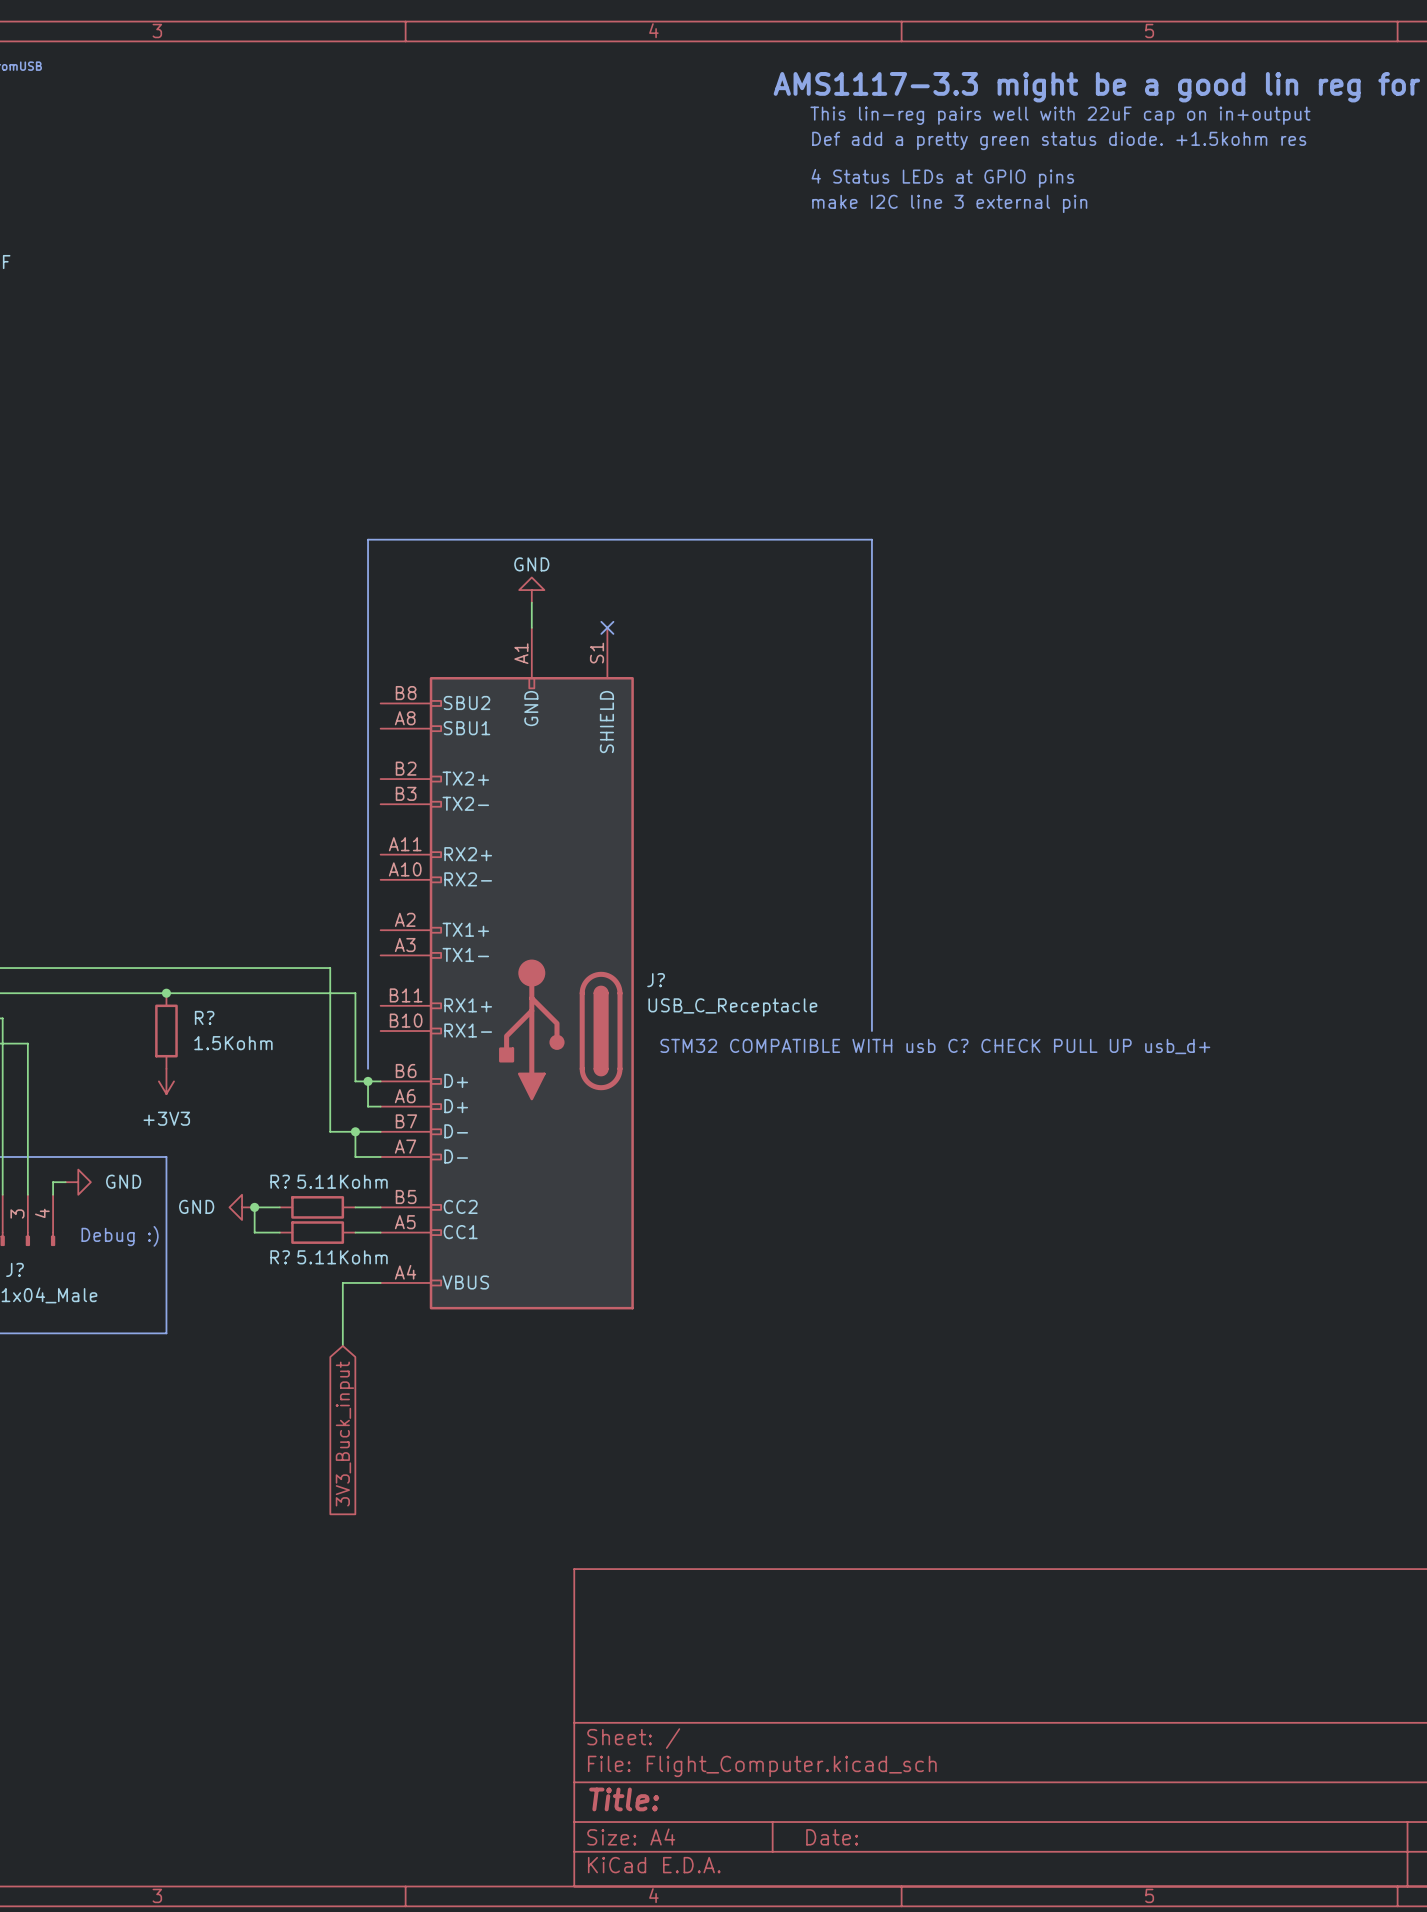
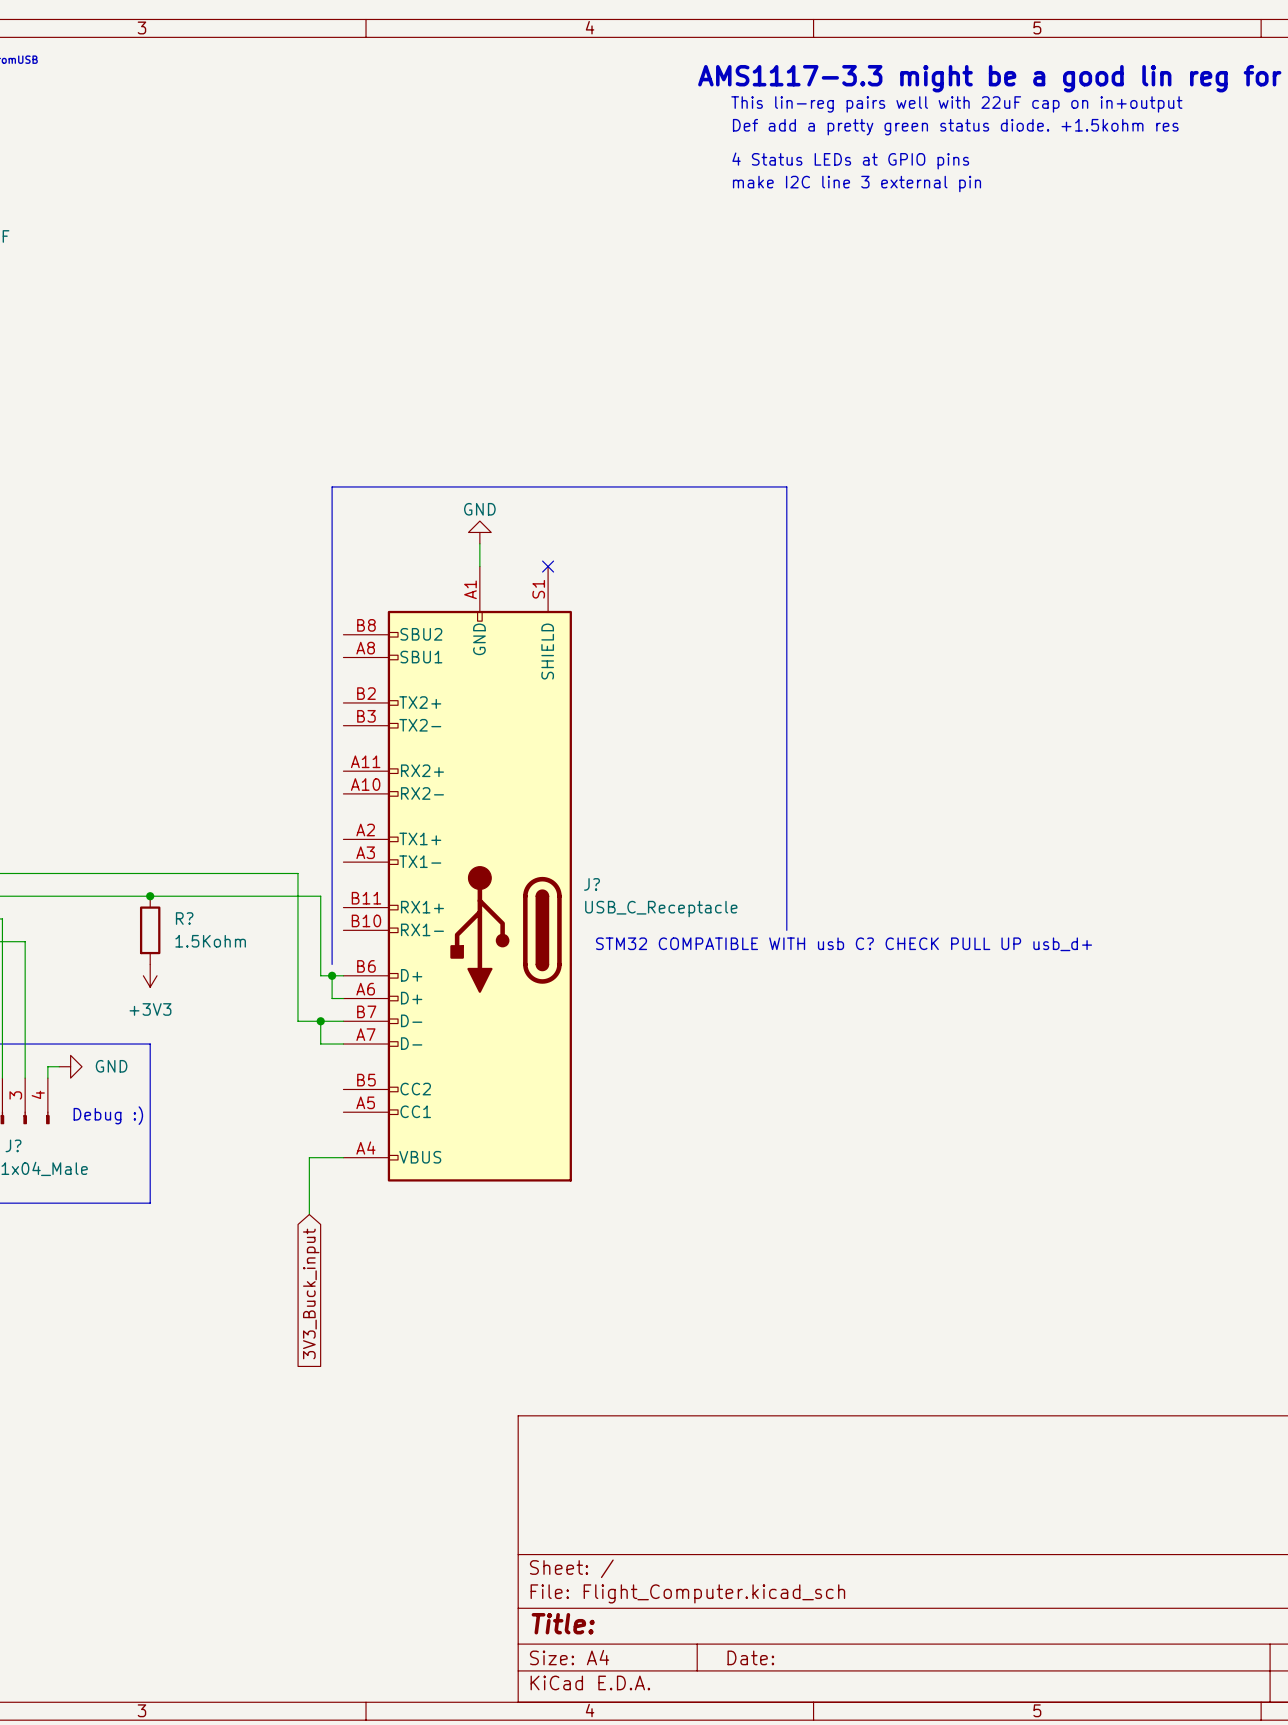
power symbol: GND (242, 1207) -> none
junction: (254, 1207) -> none
wire: (279, 1207) (254, 1207) (254, 1232) (279, 1232) -> none
R?: 5.11Kohm (317, 1207) -> none
wire: (355, 1207) (380, 1207) -> none
R?: 5.11Kohm (317, 1232) -> none
wire: (355, 1232) (380, 1232) -> none

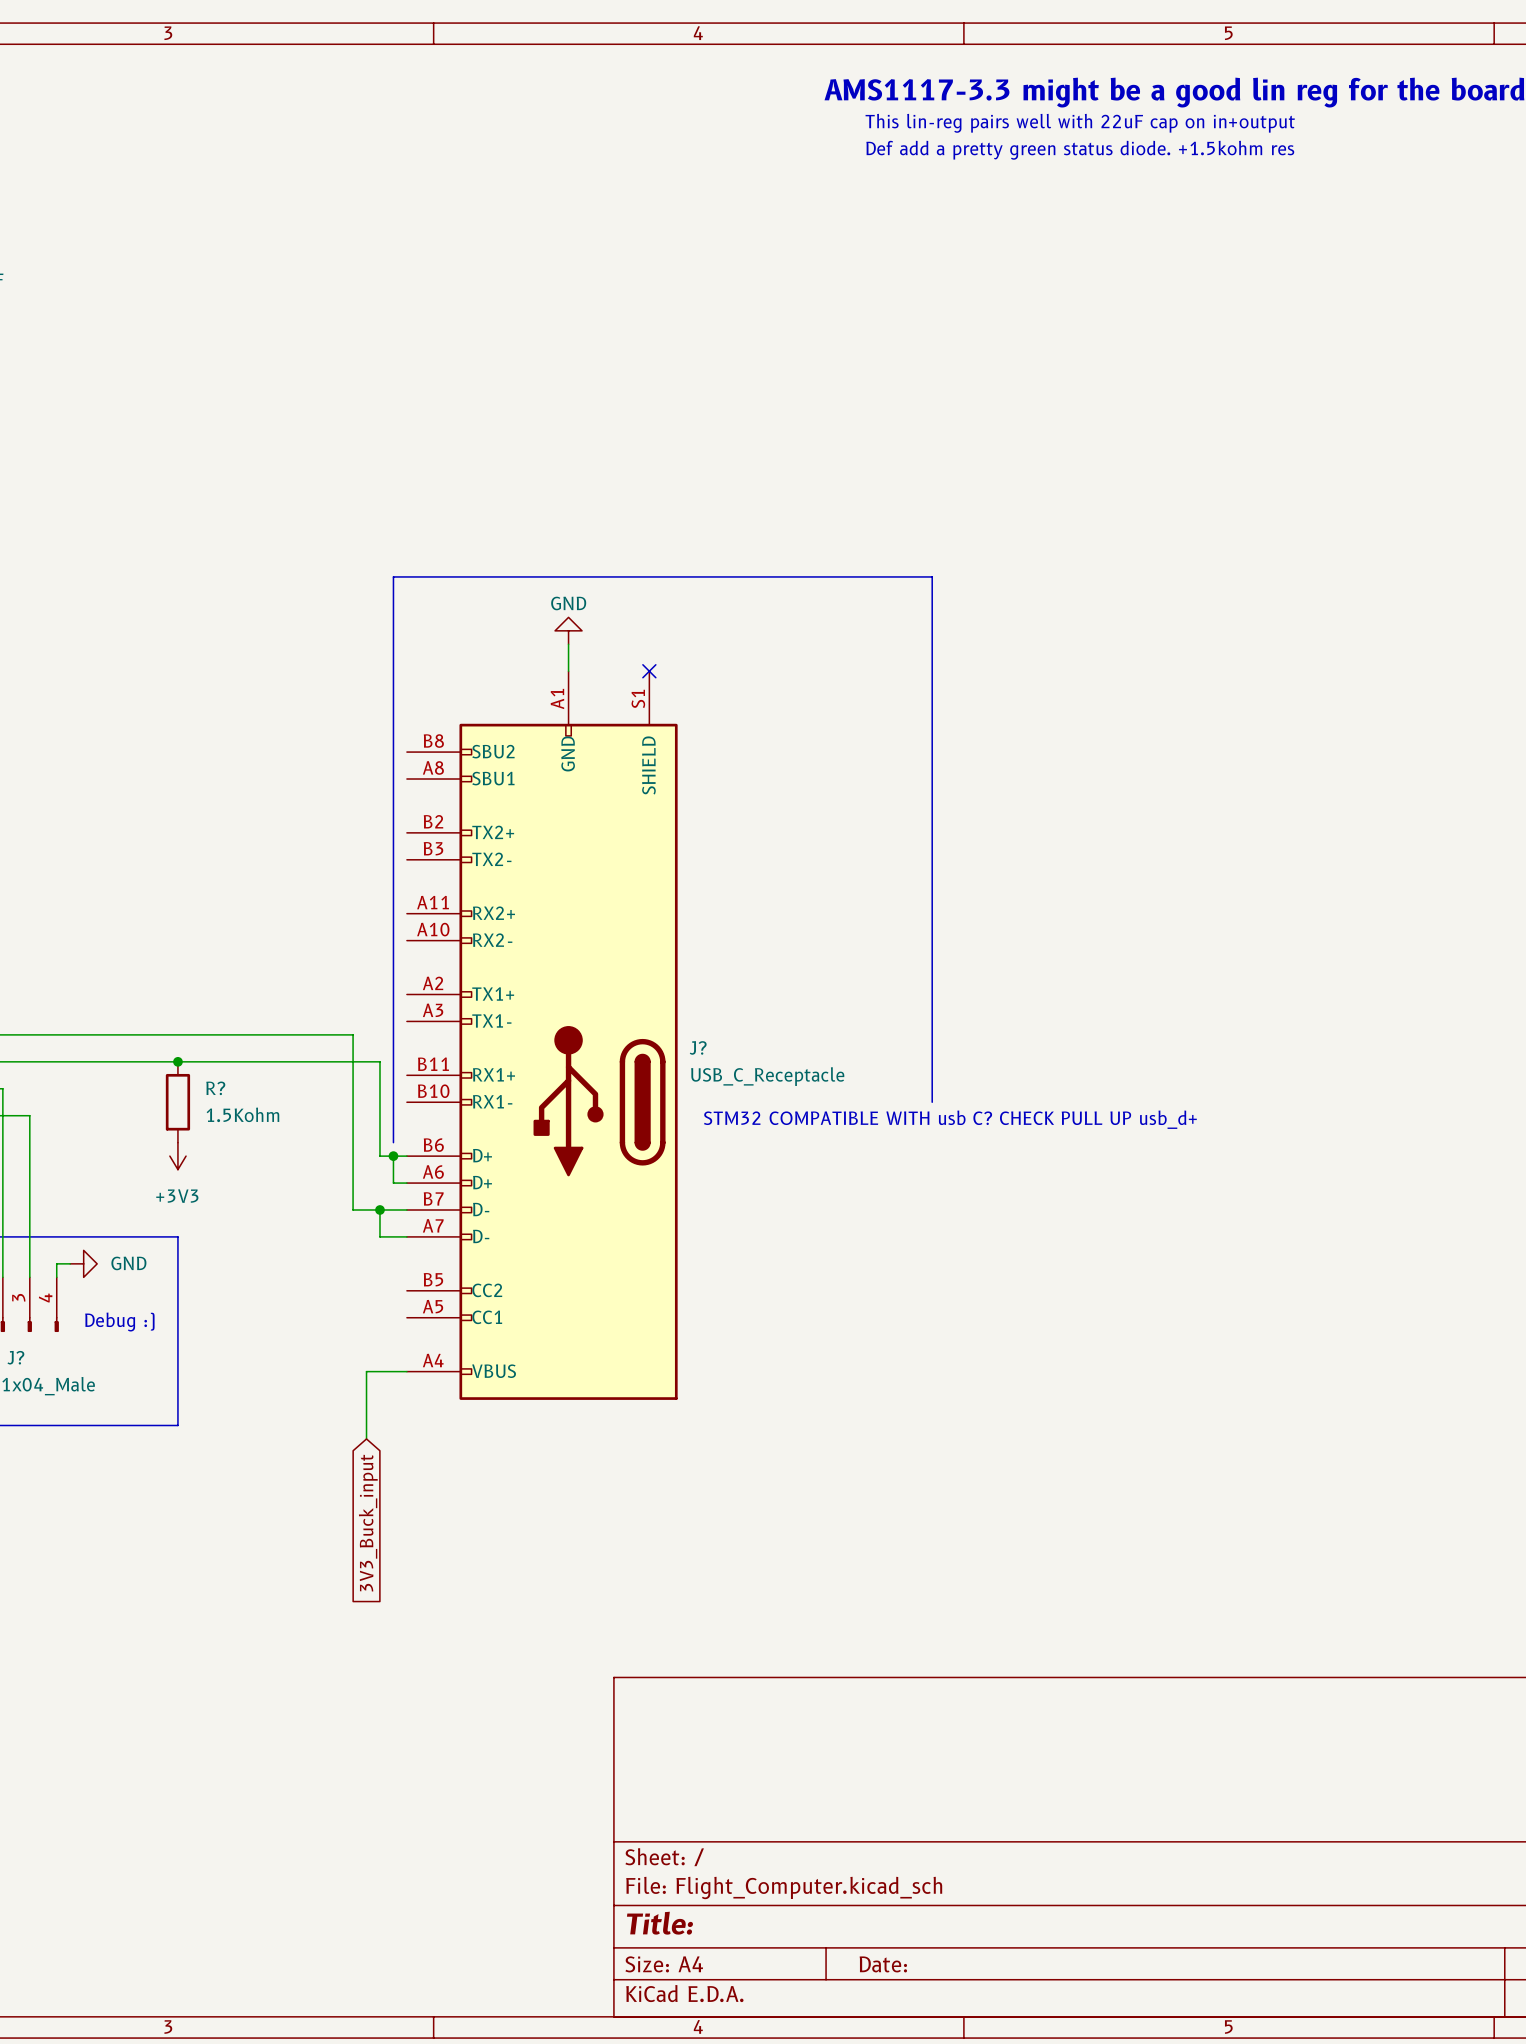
text: 4 Status LEDs at GPIO pins (850, 160) -> none
text: make I2C line 3 external pin (856, 183) -> none

